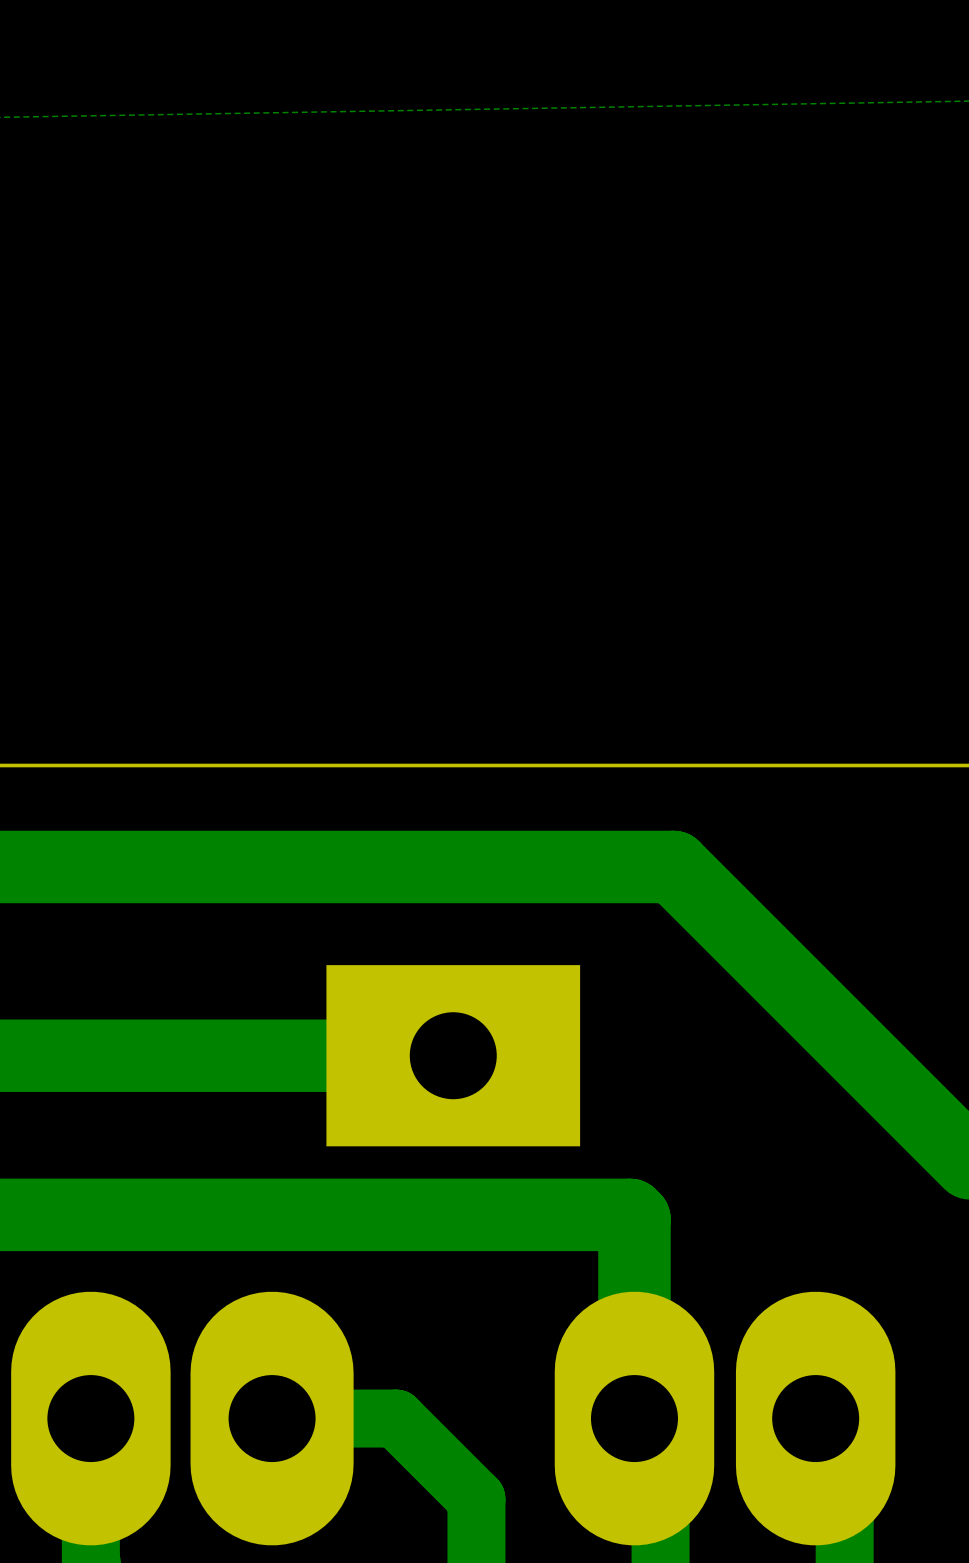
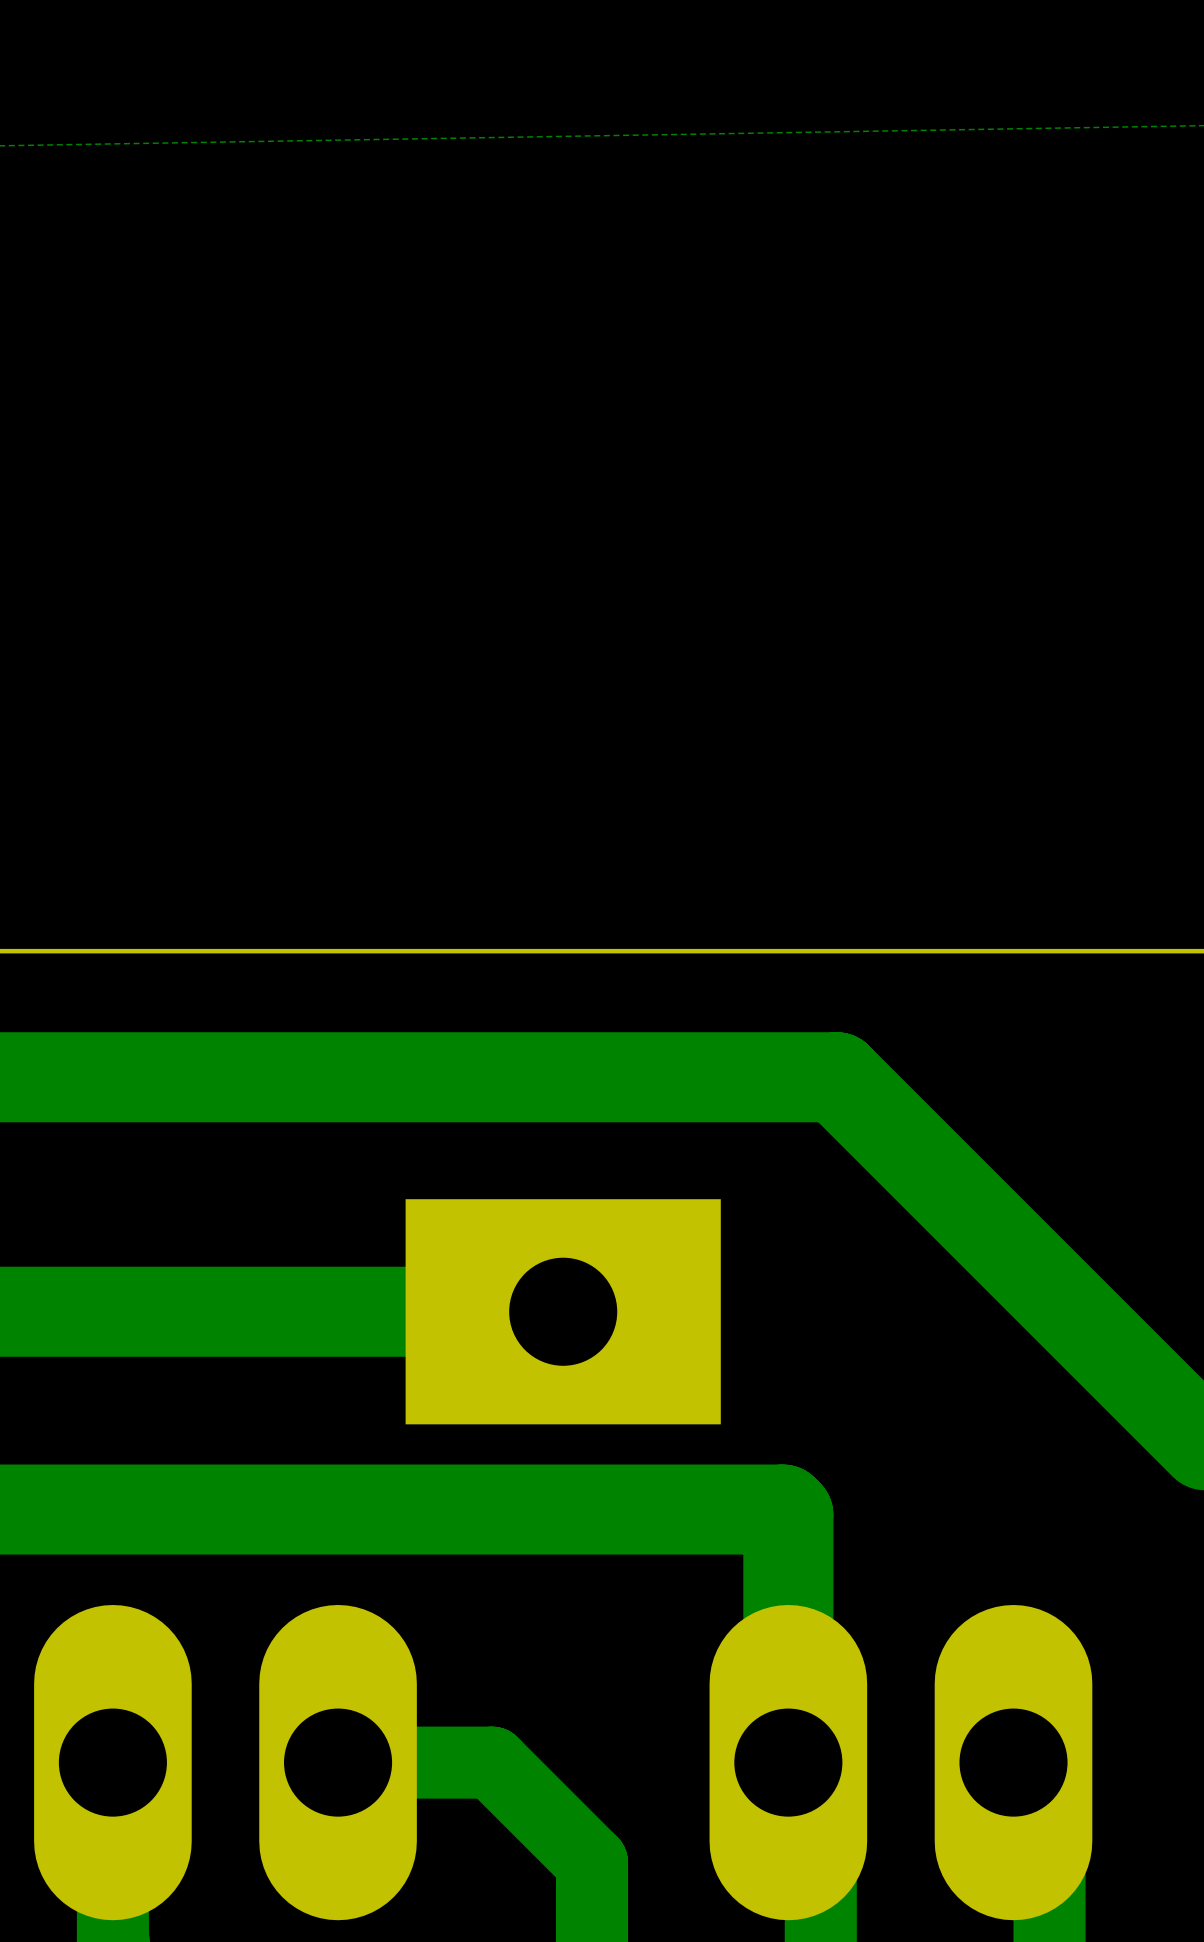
part footprint: [11, 965, 896, 1546] -> [34, 1199, 1093, 1921]

